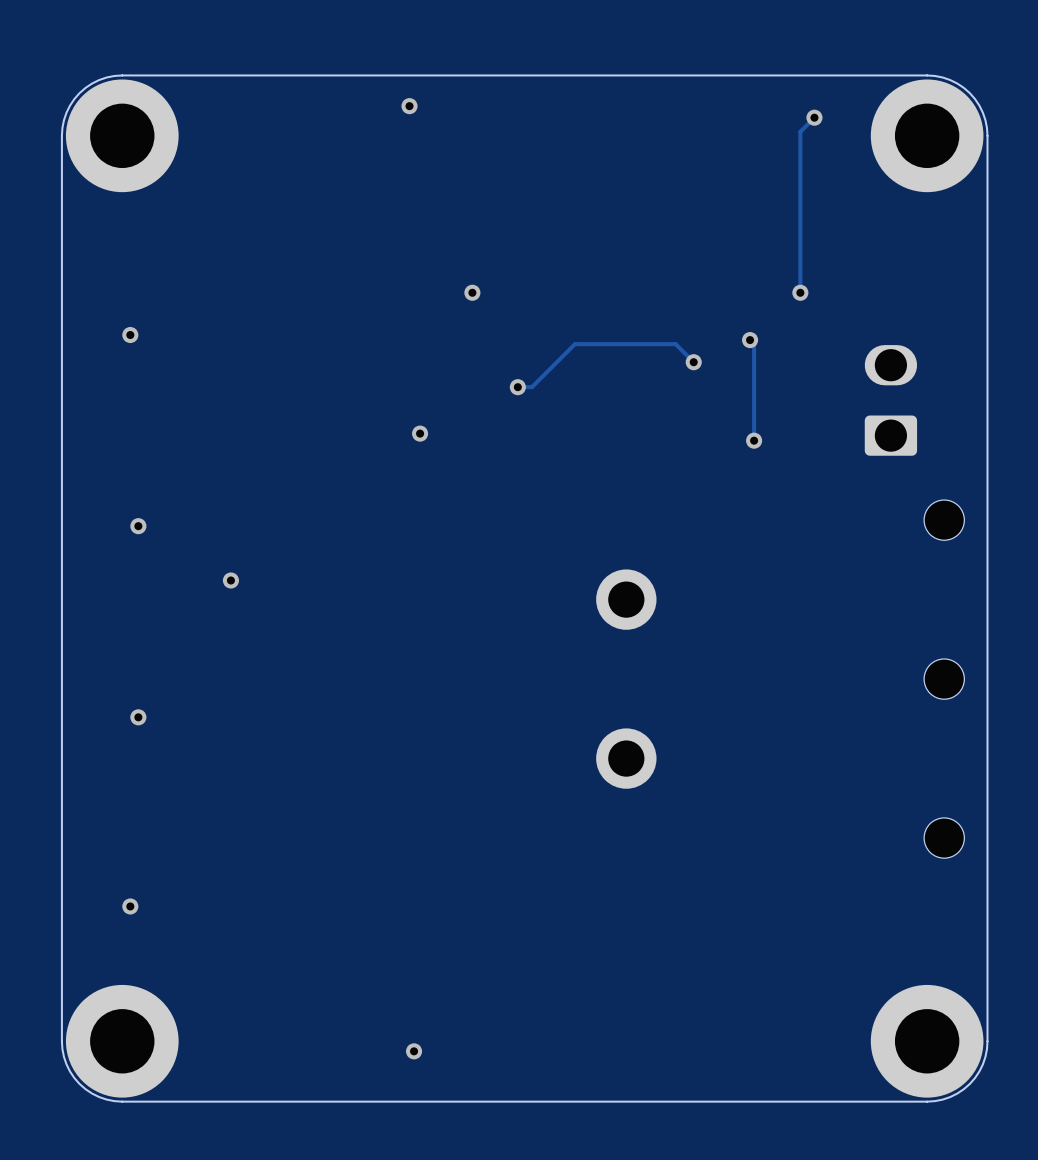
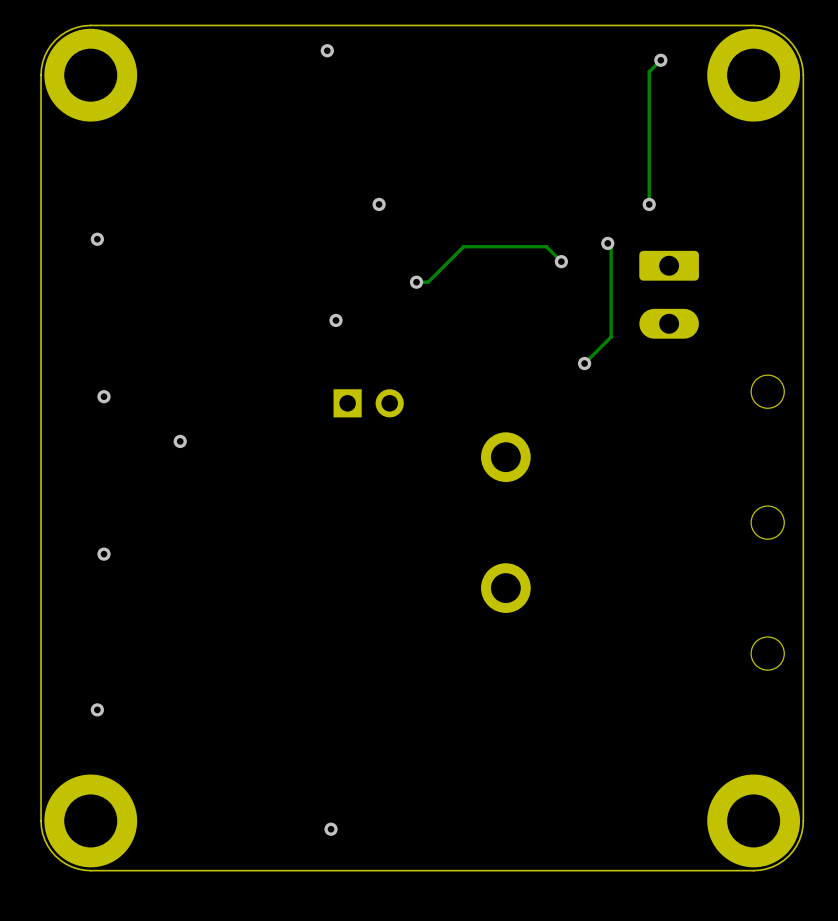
part: (890, 400) -> none
part: none -> (669, 294)
track: none -> (611, 326) (611, 337) (584, 363)
via position: (754, 440) -> (584, 363)
part: none -> (368, 403)

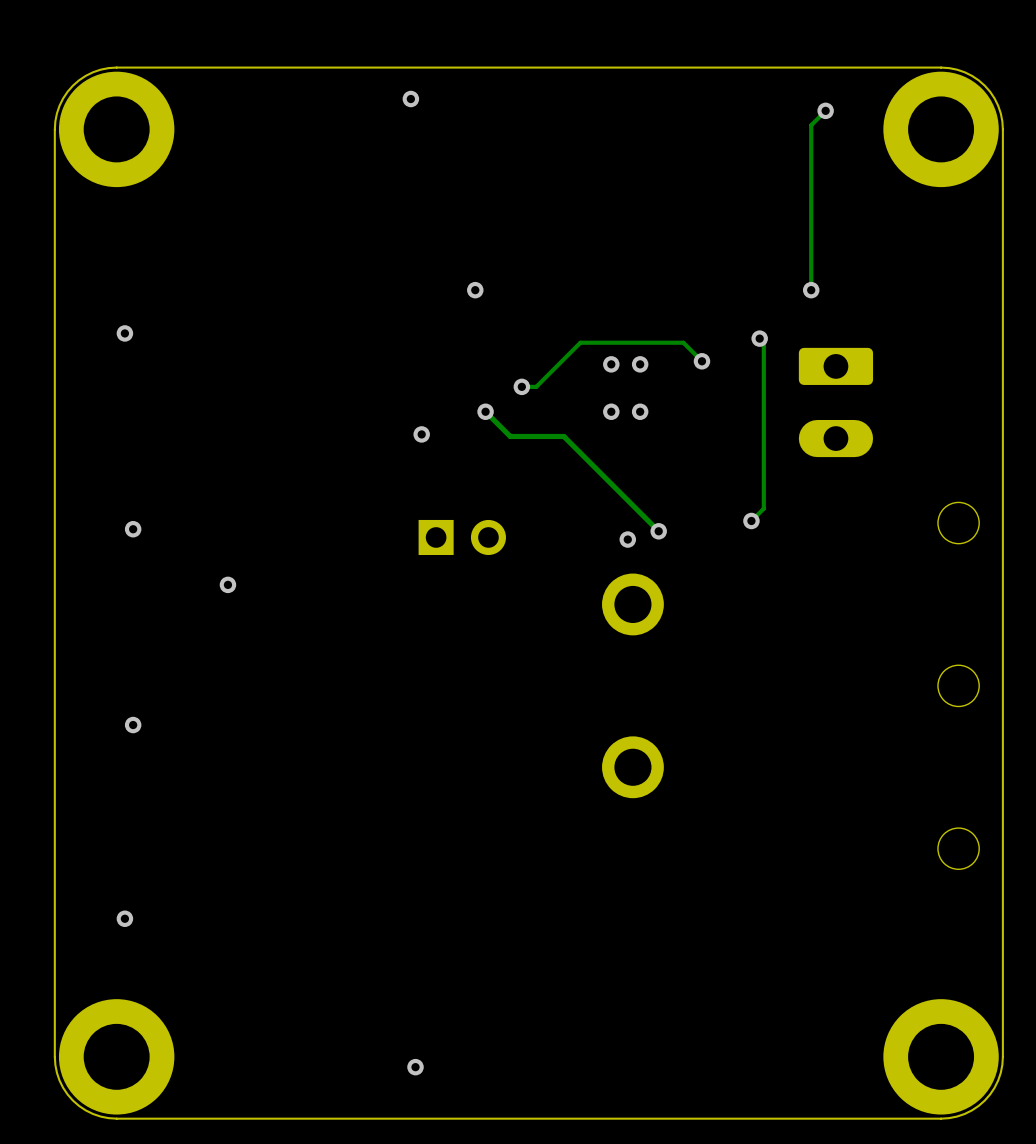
via: none -> (611, 364)
via: none -> (640, 364)
track: none -> (485, 411) (510, 436) (563, 436) (658, 531)
via: none -> (485, 411)
via: none -> (611, 411)
via: none -> (640, 411)
track: (611, 337) (584, 363) -> (763, 455) (763, 508) (751, 520)
via position: (584, 363) -> (751, 520)
via: none -> (658, 531)
via: none -> (627, 539)

